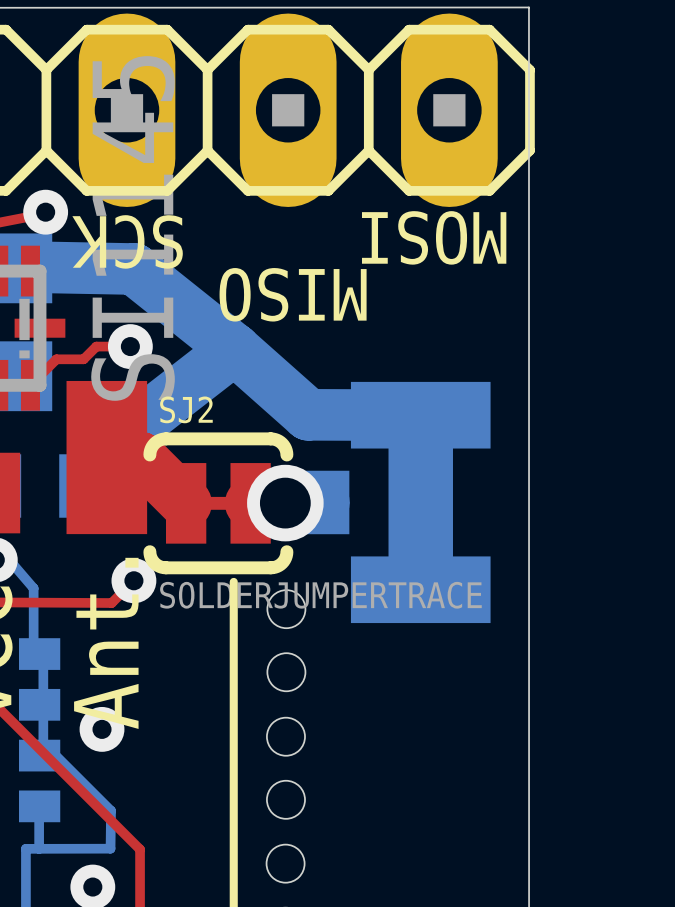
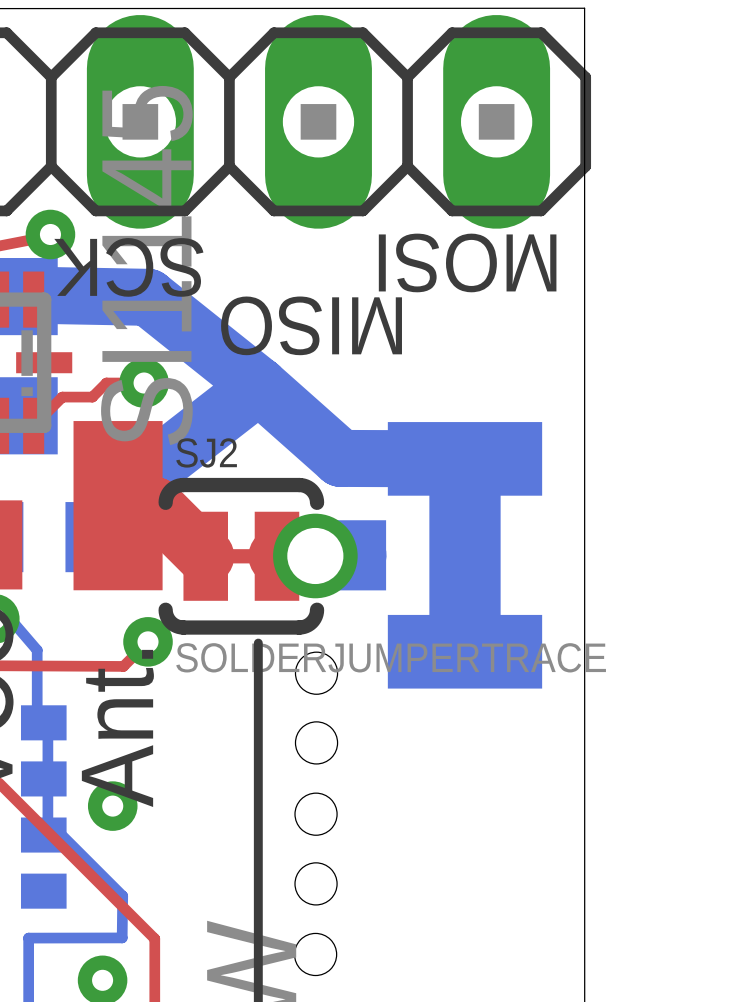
bottom track: (39, 806) (39, 848) -> none

